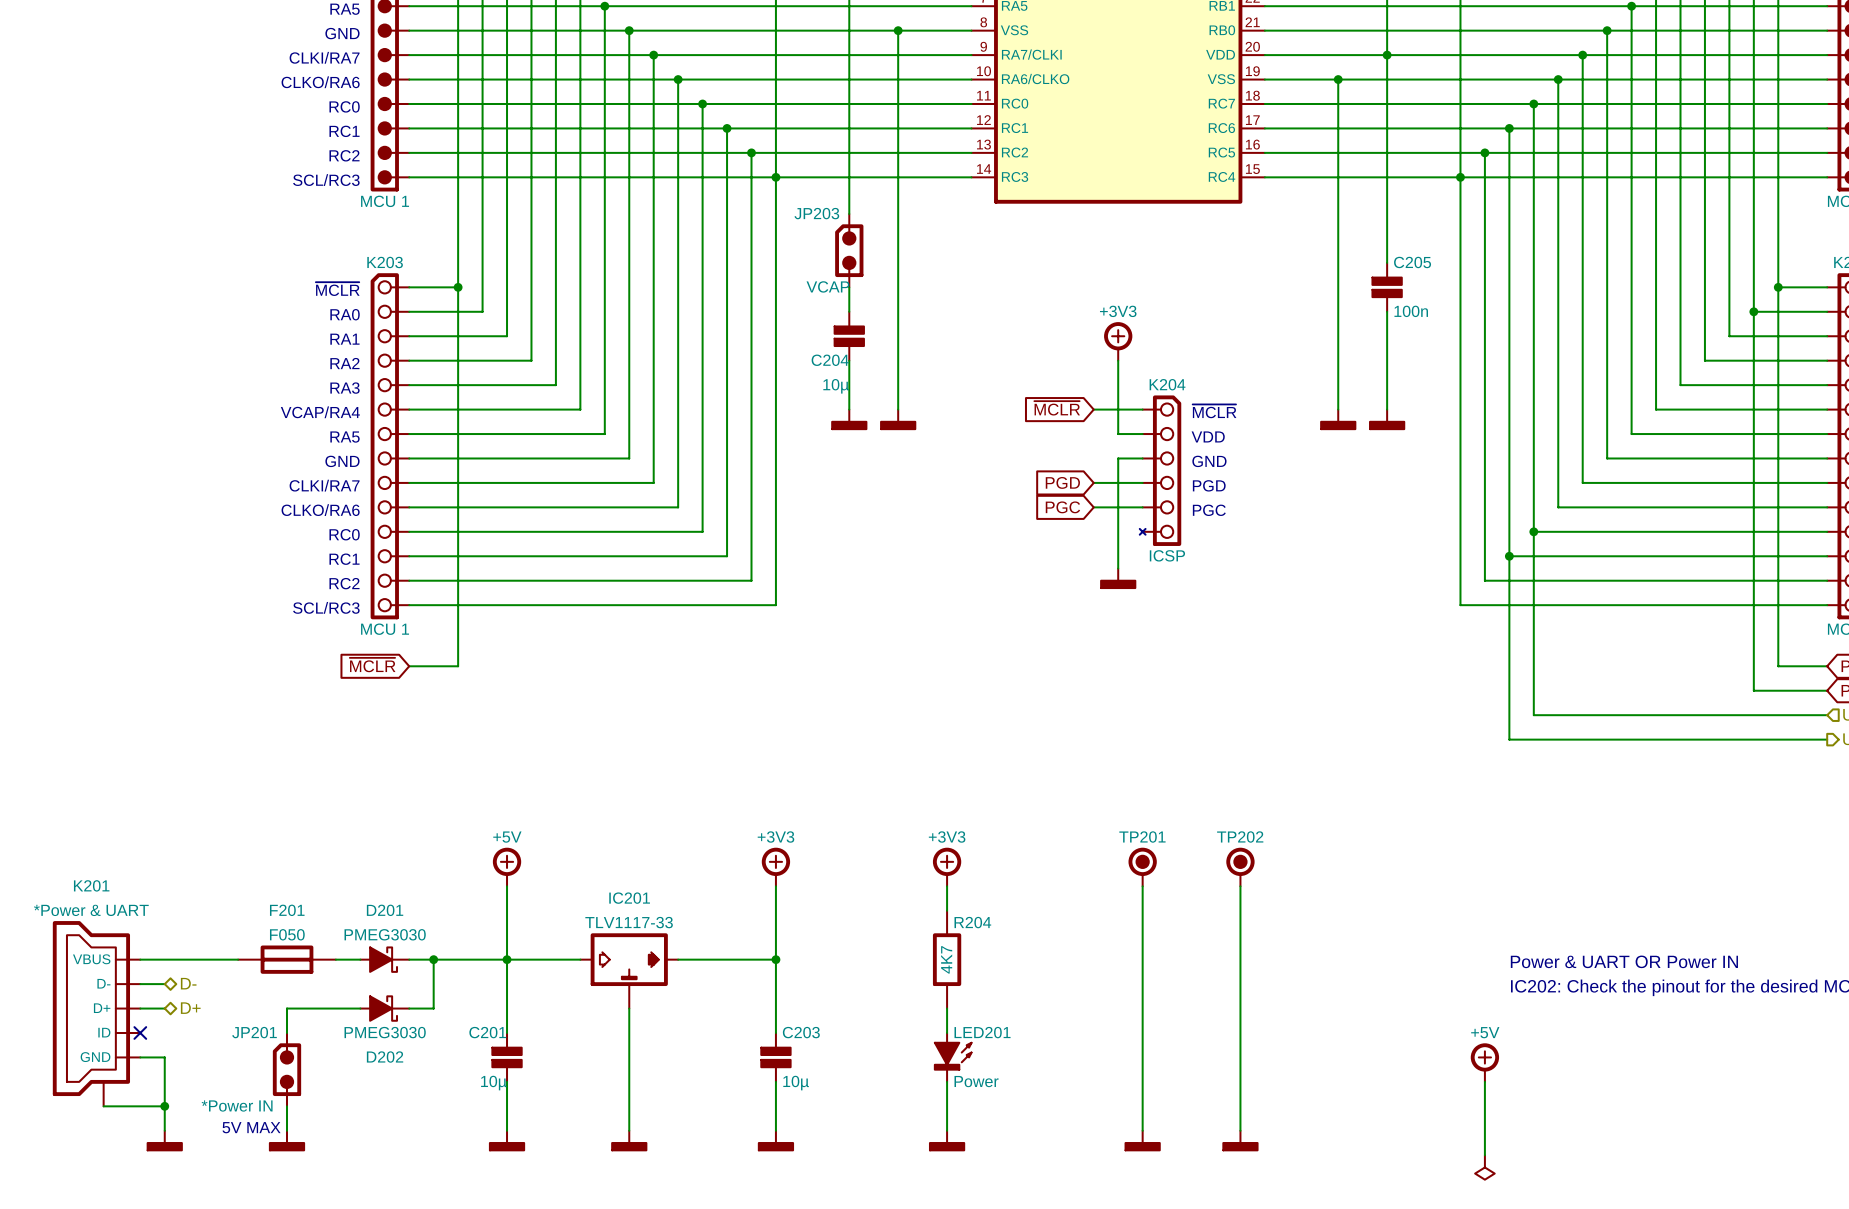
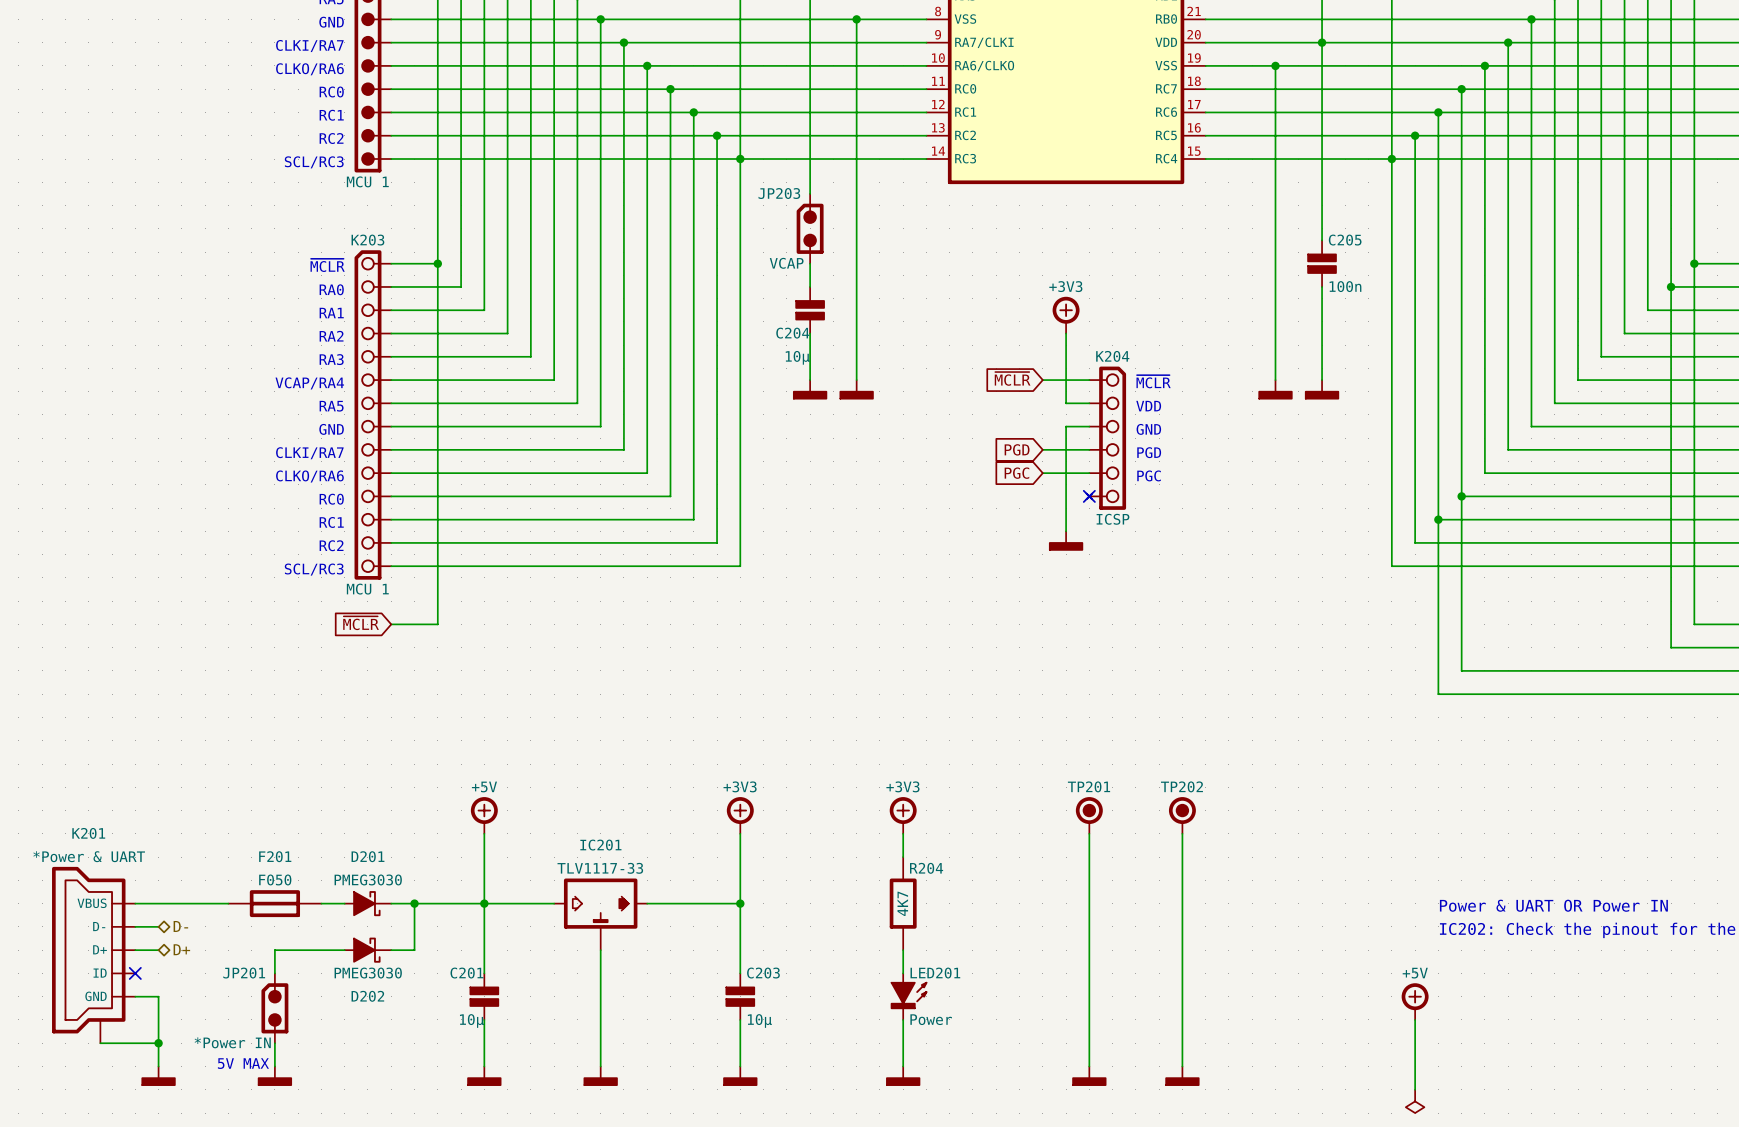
no-connect mark: none -> (1089, 496)

